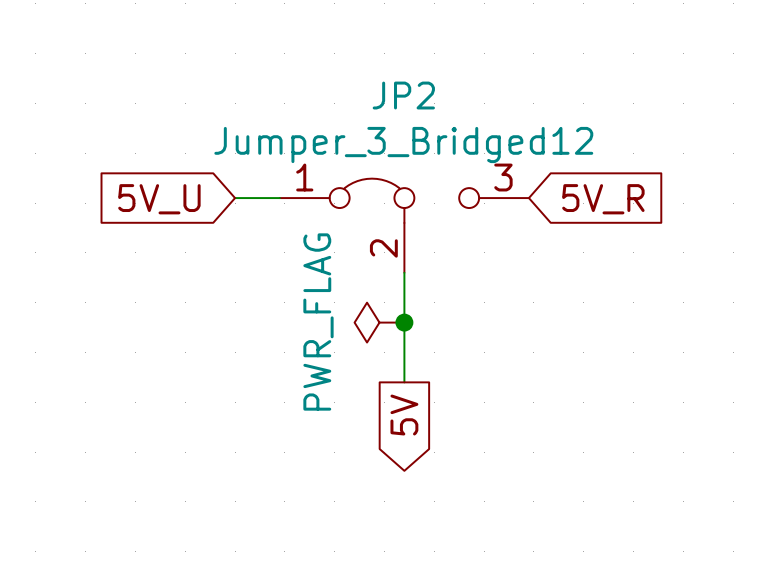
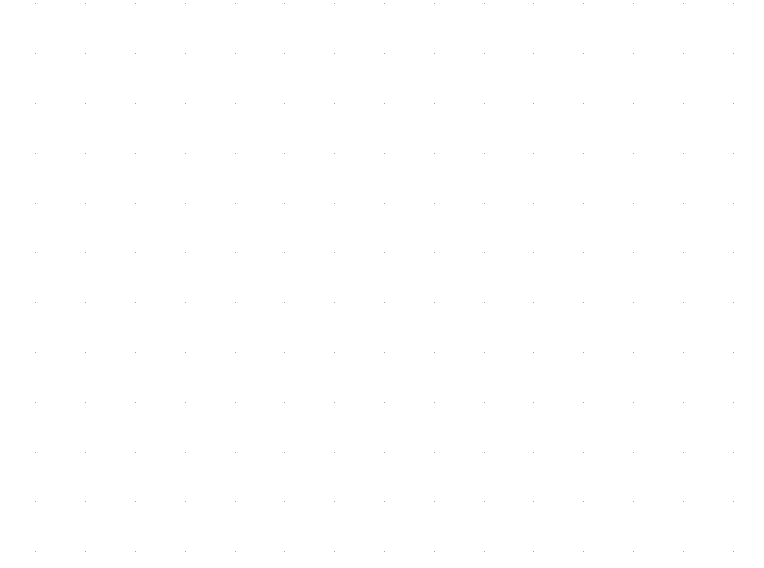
wire: (235, 198) (279, 198) -> none
global label: 5V_U (159, 199) -> none
global label: 5V_R (603, 199) -> none
JP2: Jumper_3_Bridged12 (404, 225) -> none
wire: (404, 272) (404, 382) -> none
power symbol: PWR_FLAG (379, 322) -> none
junction: (404, 322) -> none
global label: 5V (404, 415) -> none

